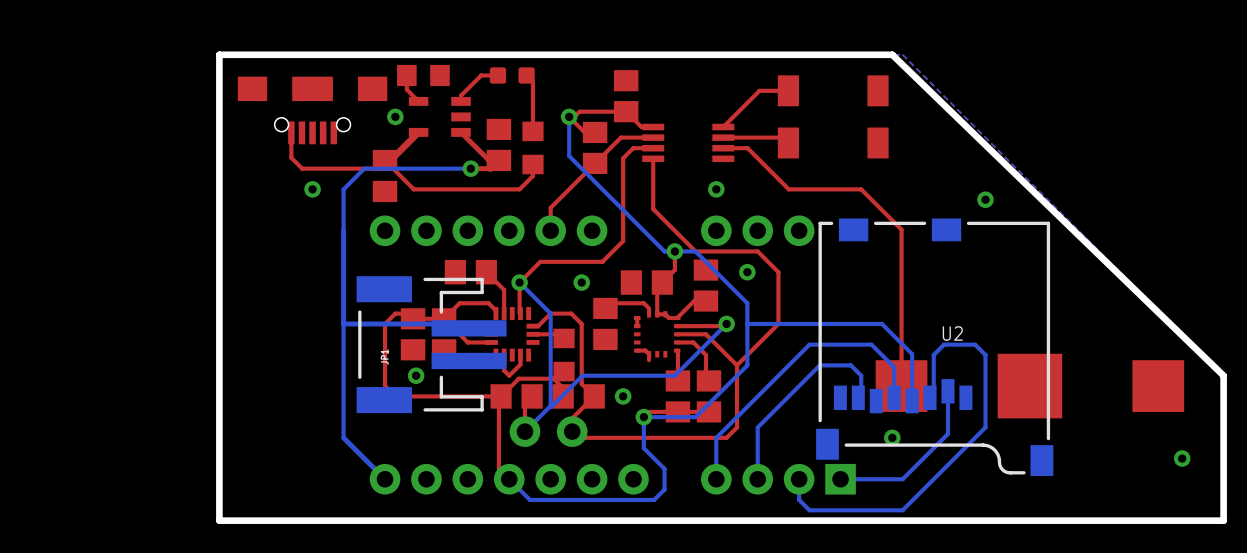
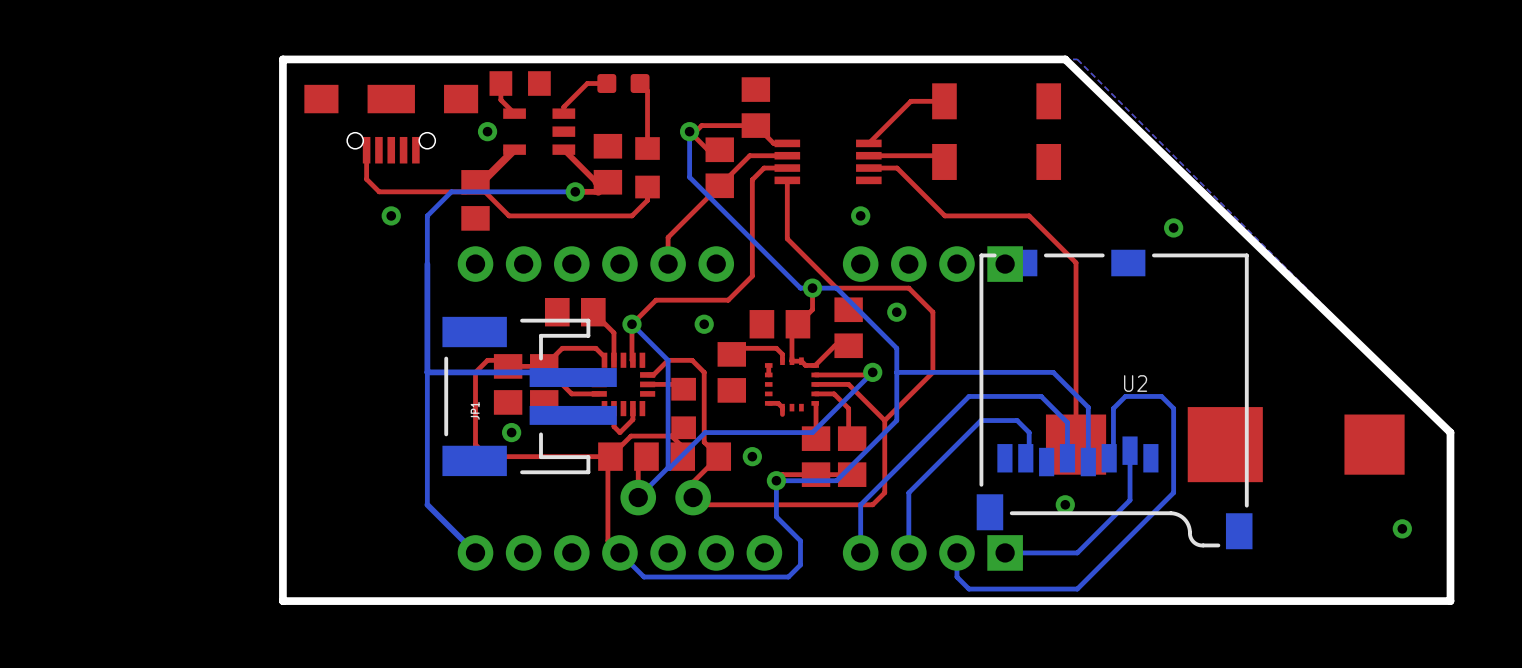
part: none -> (932, 264)

